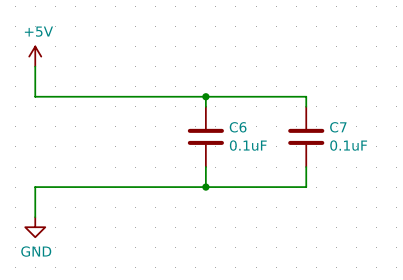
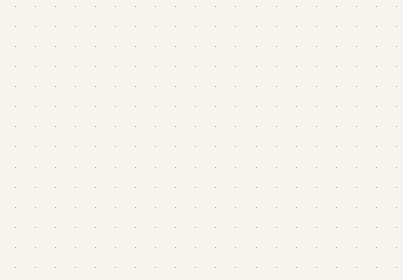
power symbol: +5V (35, 56) -> none
wire: (35, 66) (35, 96) (306, 96) (306, 106) -> none
wire: (205, 96) (205, 106) -> none
junction: (205, 96) -> none
C6: 0.1uF (205, 136) -> none
C7: 0.1uF (306, 136) -> none
wire: (205, 167) (205, 187) -> none
wire: (306, 167) (306, 187) (35, 187) (35, 217) -> none
junction: (205, 187) -> none
power symbol: GND (35, 227) -> none

